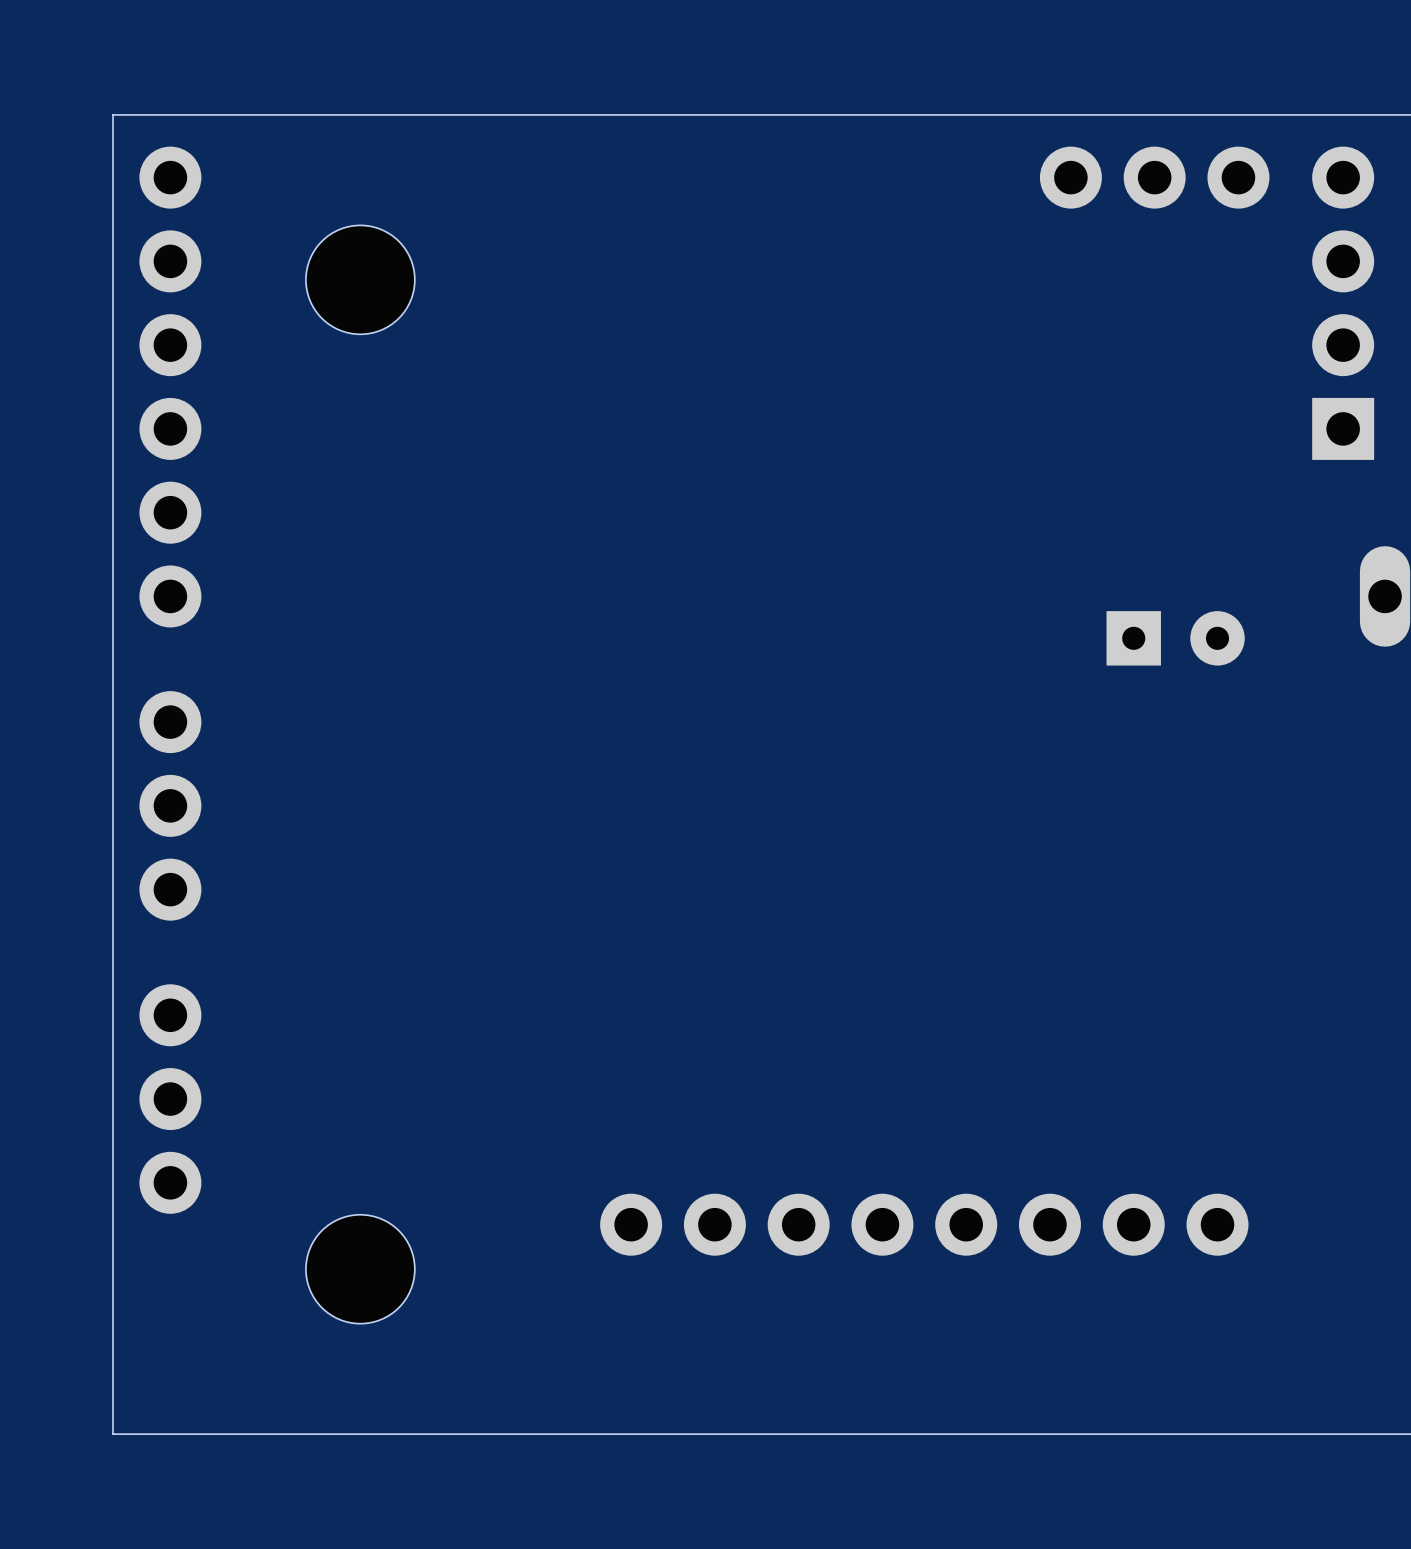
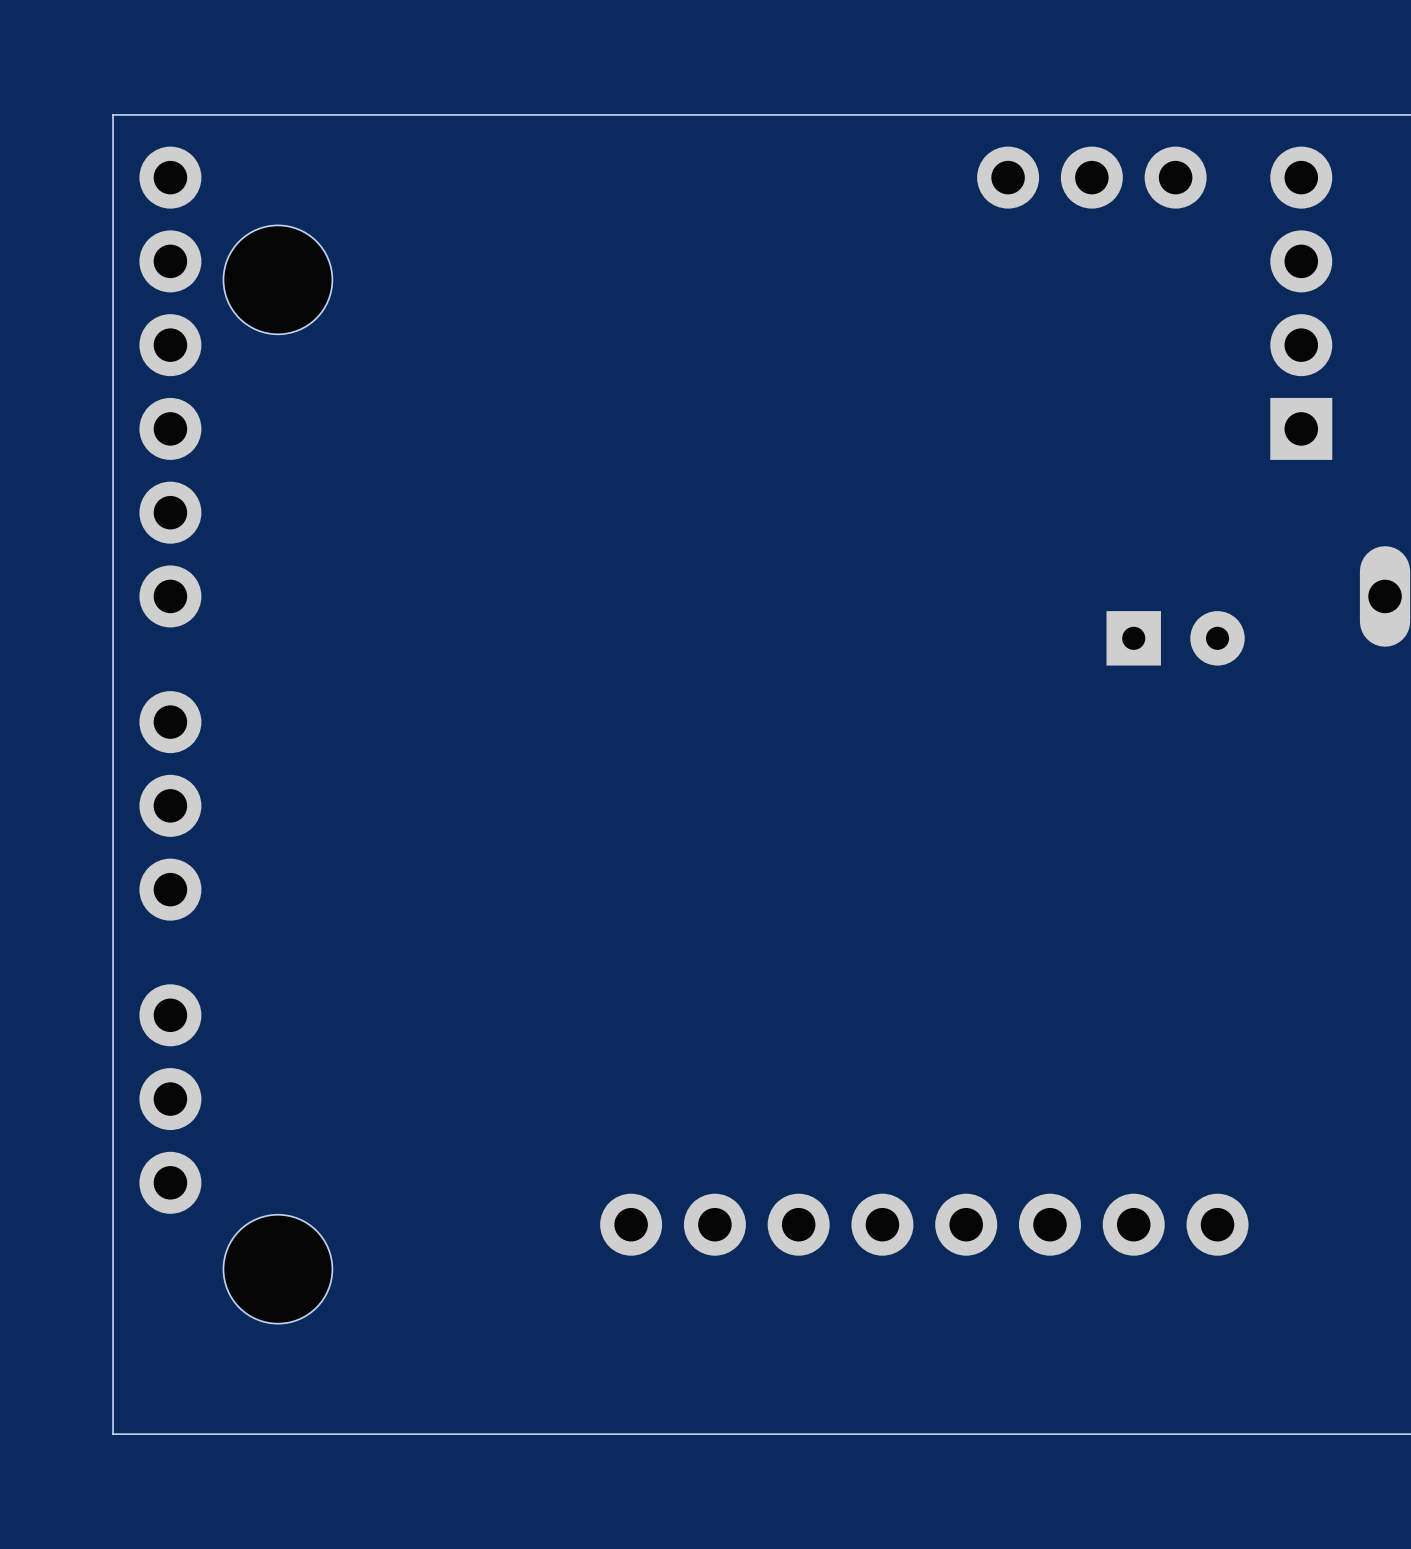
part position: (1154, 177) -> (1091, 177)
part position: (360, 279) -> (277, 279)
part position: (1343, 303) -> (1301, 303)
part position: (360, 1269) -> (277, 1269)

